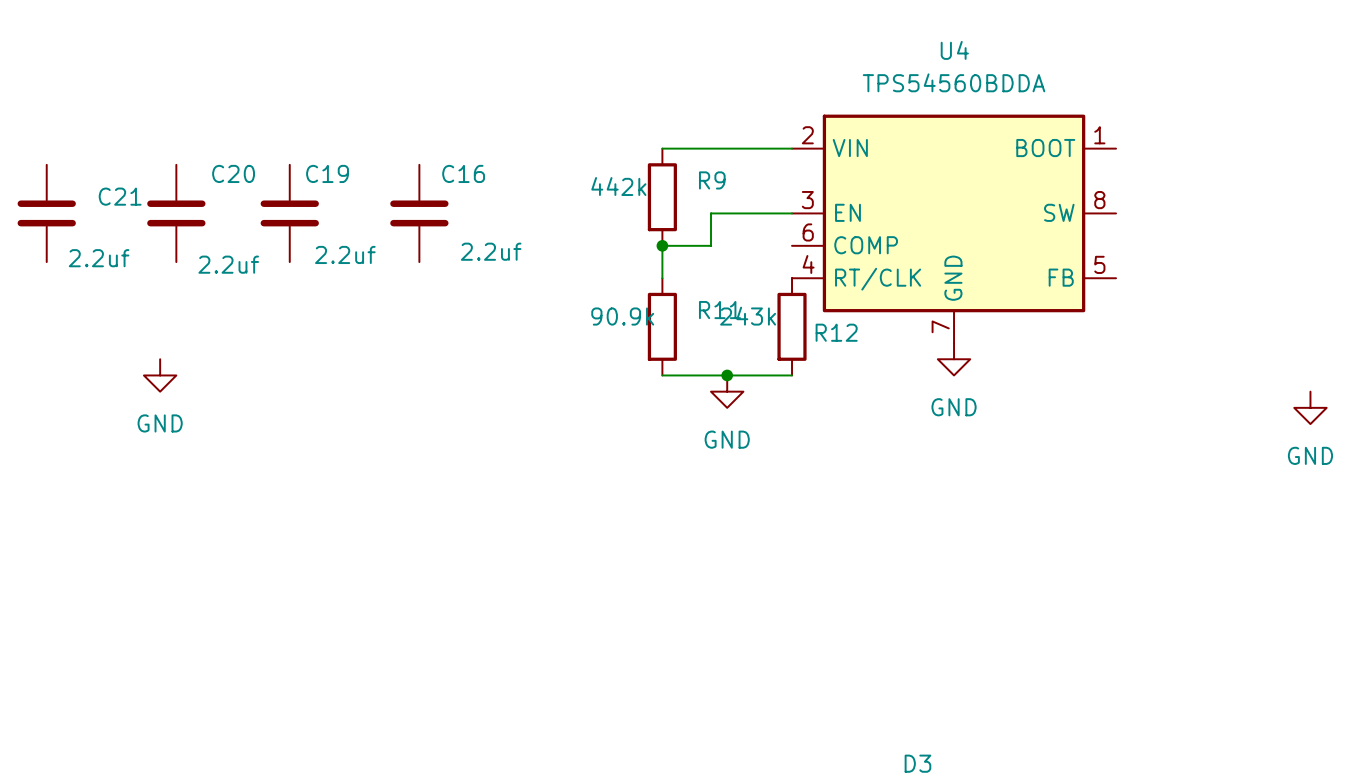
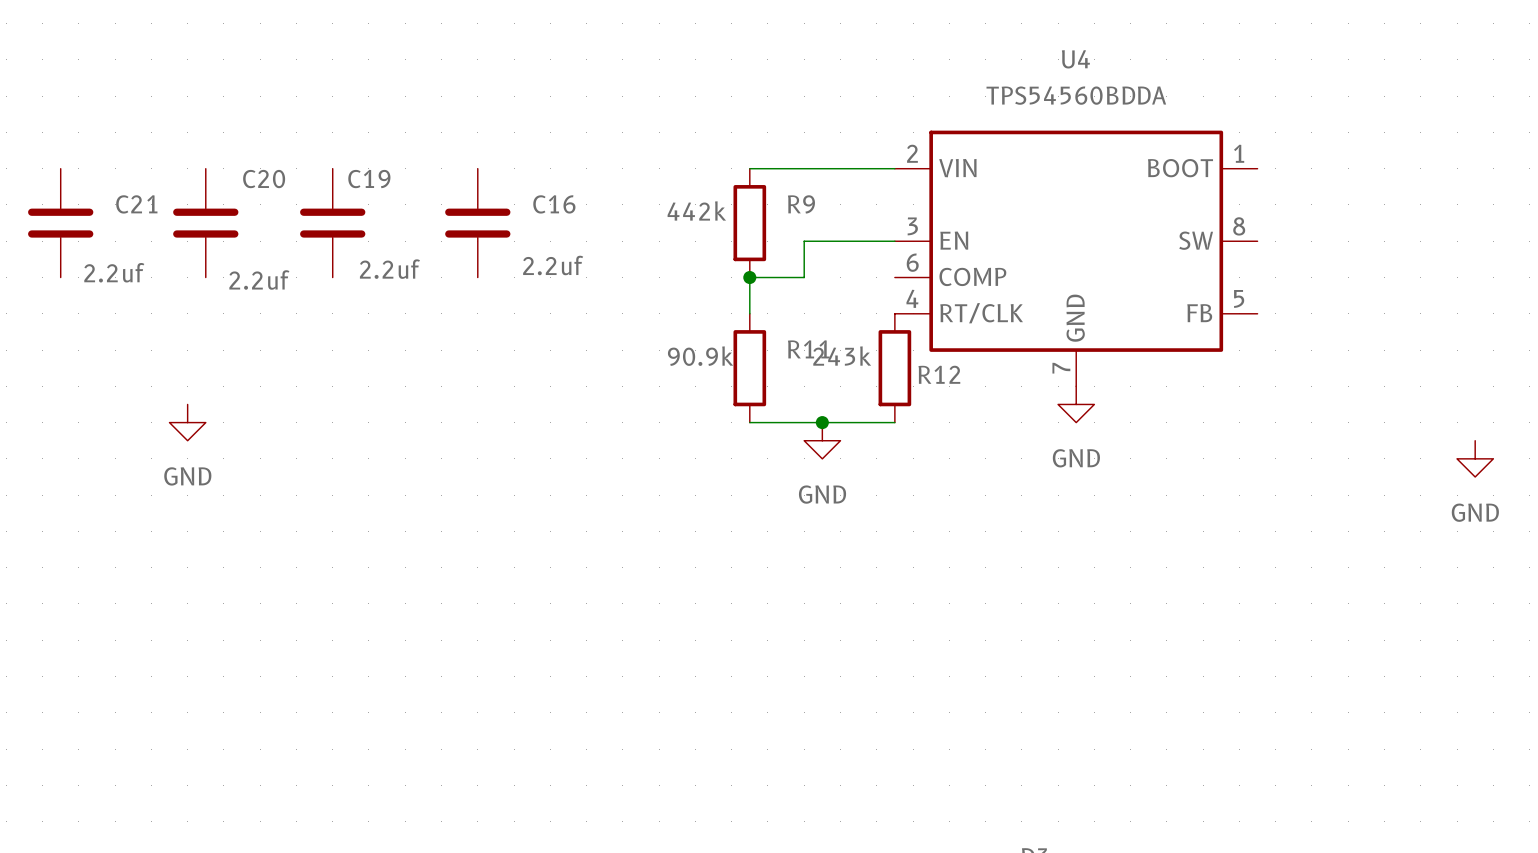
C16 name position: C16 (463, 173) -> C16 (554, 204)
C21 position: (46, 213) -> (60, 223)
C20 position: (176, 213) -> (205, 223)
C19 position: (289, 213) -> (332, 223)
C16 position: (419, 213) -> (477, 223)

